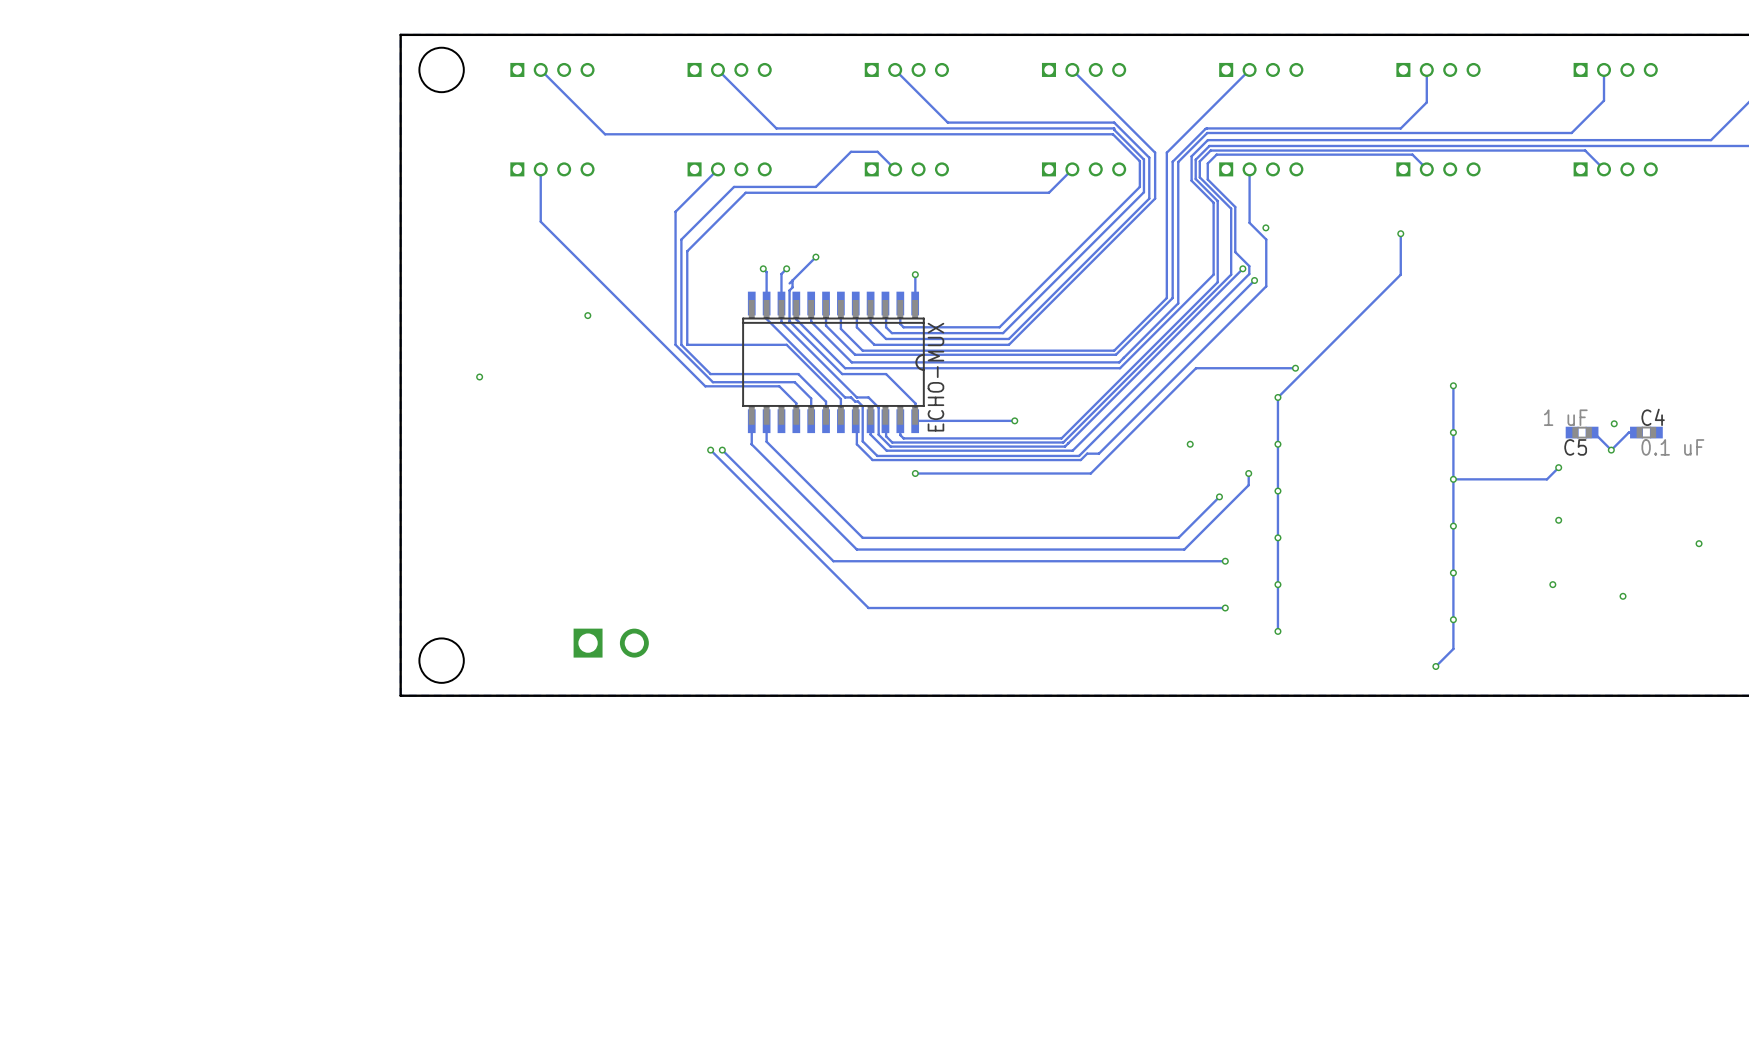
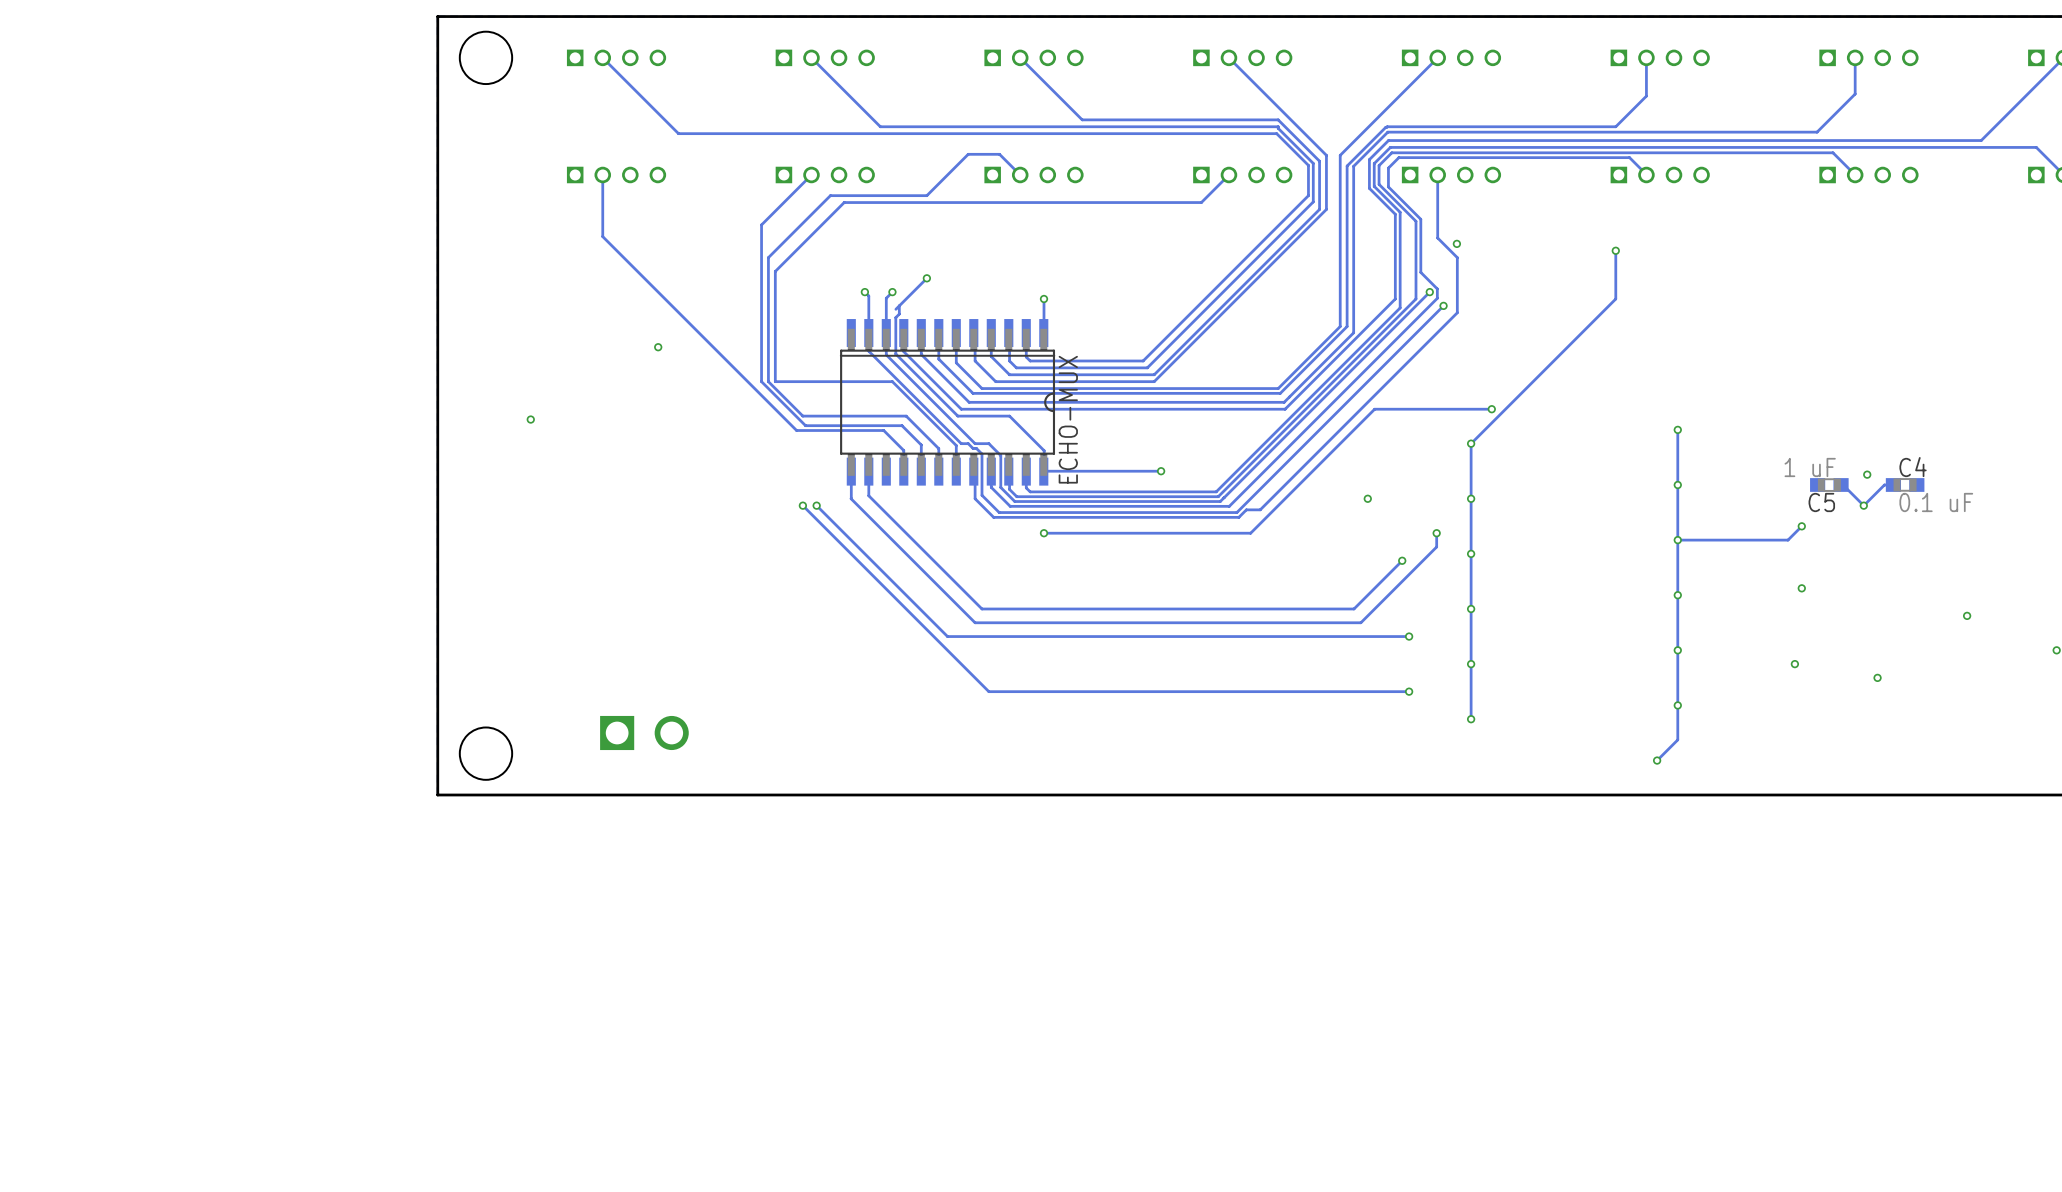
part position: (611, 643) -> (644, 732)

